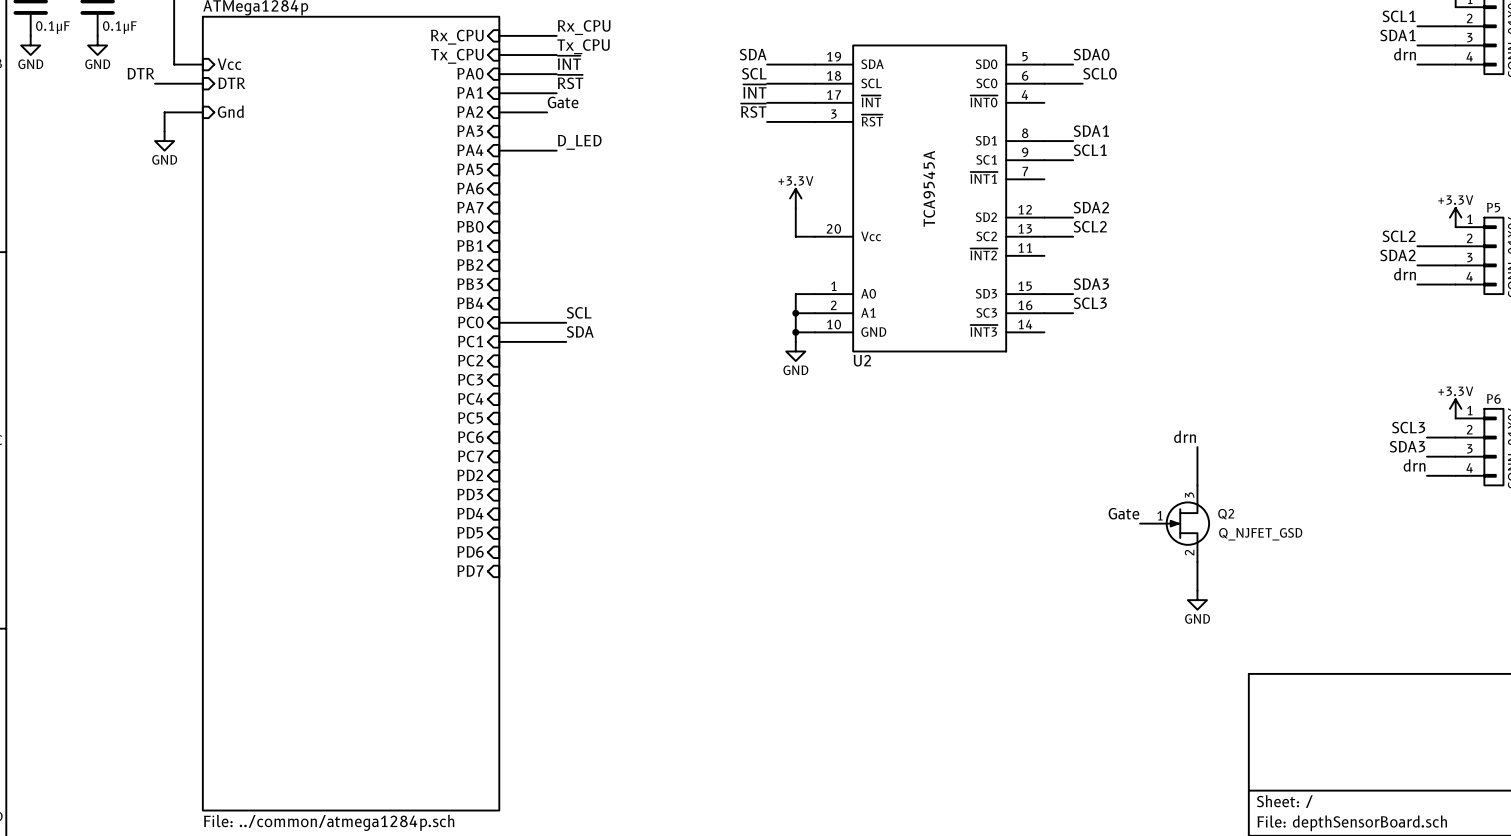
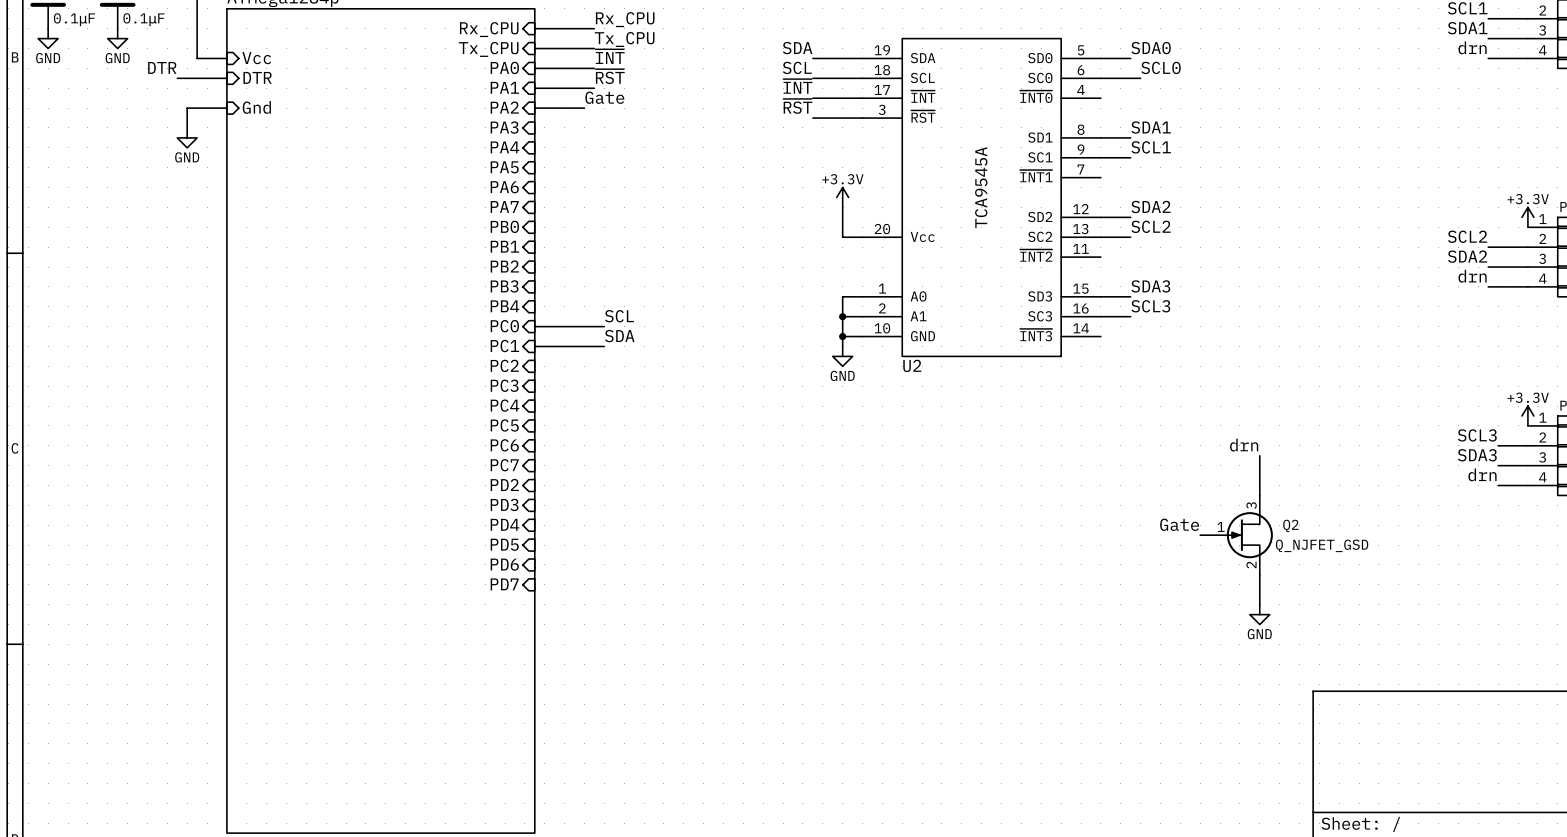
label: D_LED (579, 142) -> none
wire: (499, 150) (556, 150) -> none

